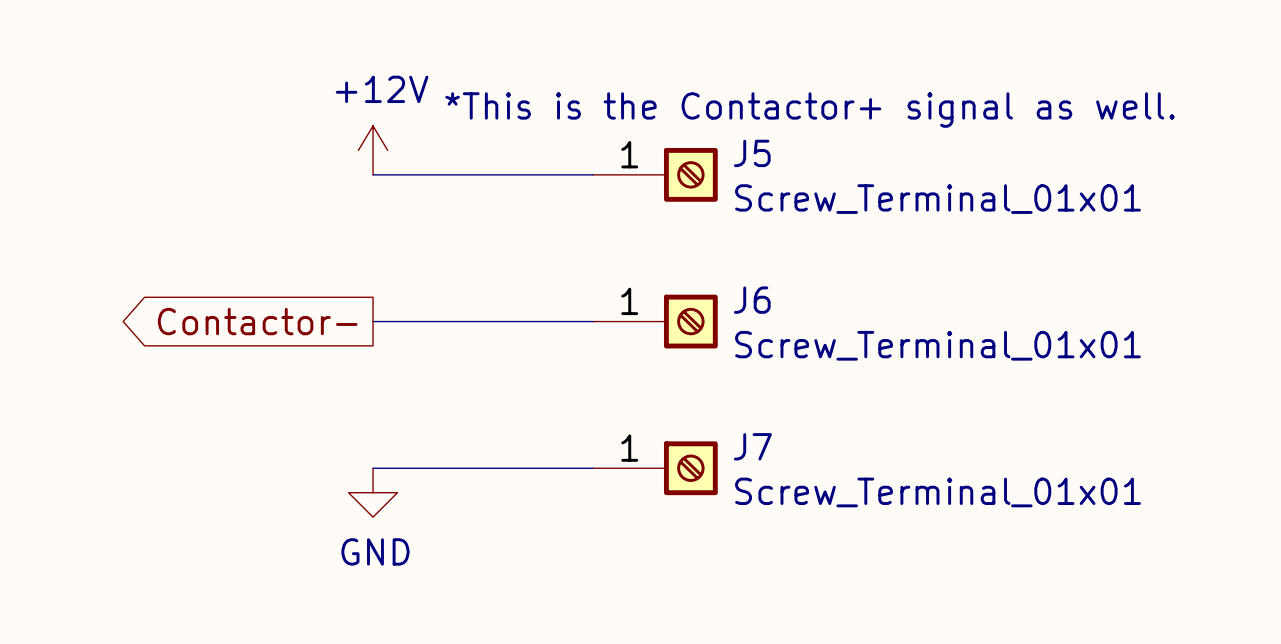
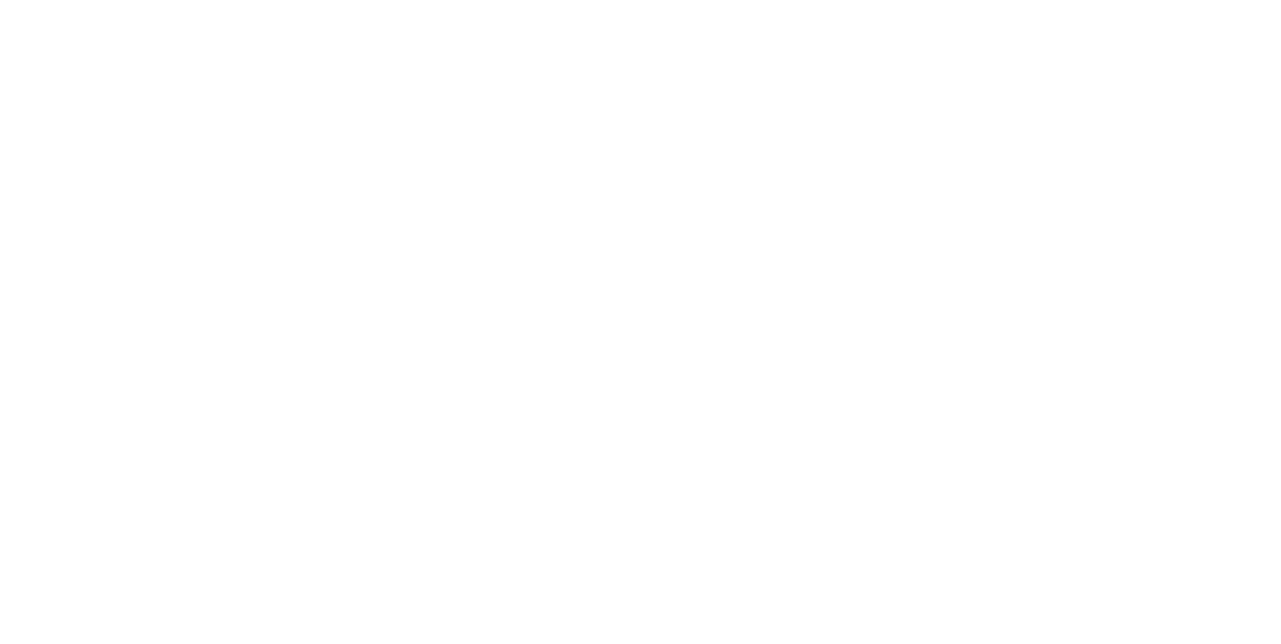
text: *This is the Contactor+ signal as well. (810, 110) -> none
power symbol: +12V (373, 150) -> none
wire: (373, 174) (593, 174) -> none
J5: Screw_Terminal_01x01 (655, 174) -> none
global label: Contactor- (257, 321) -> none
wire: (373, 321) (593, 321) -> none
J6: Screw_Terminal_01x01 (655, 321) -> none
wire: (373, 468) (593, 468) -> none
J7: Screw_Terminal_01x01 (655, 468) -> none
power symbol: GND (373, 492) -> none

